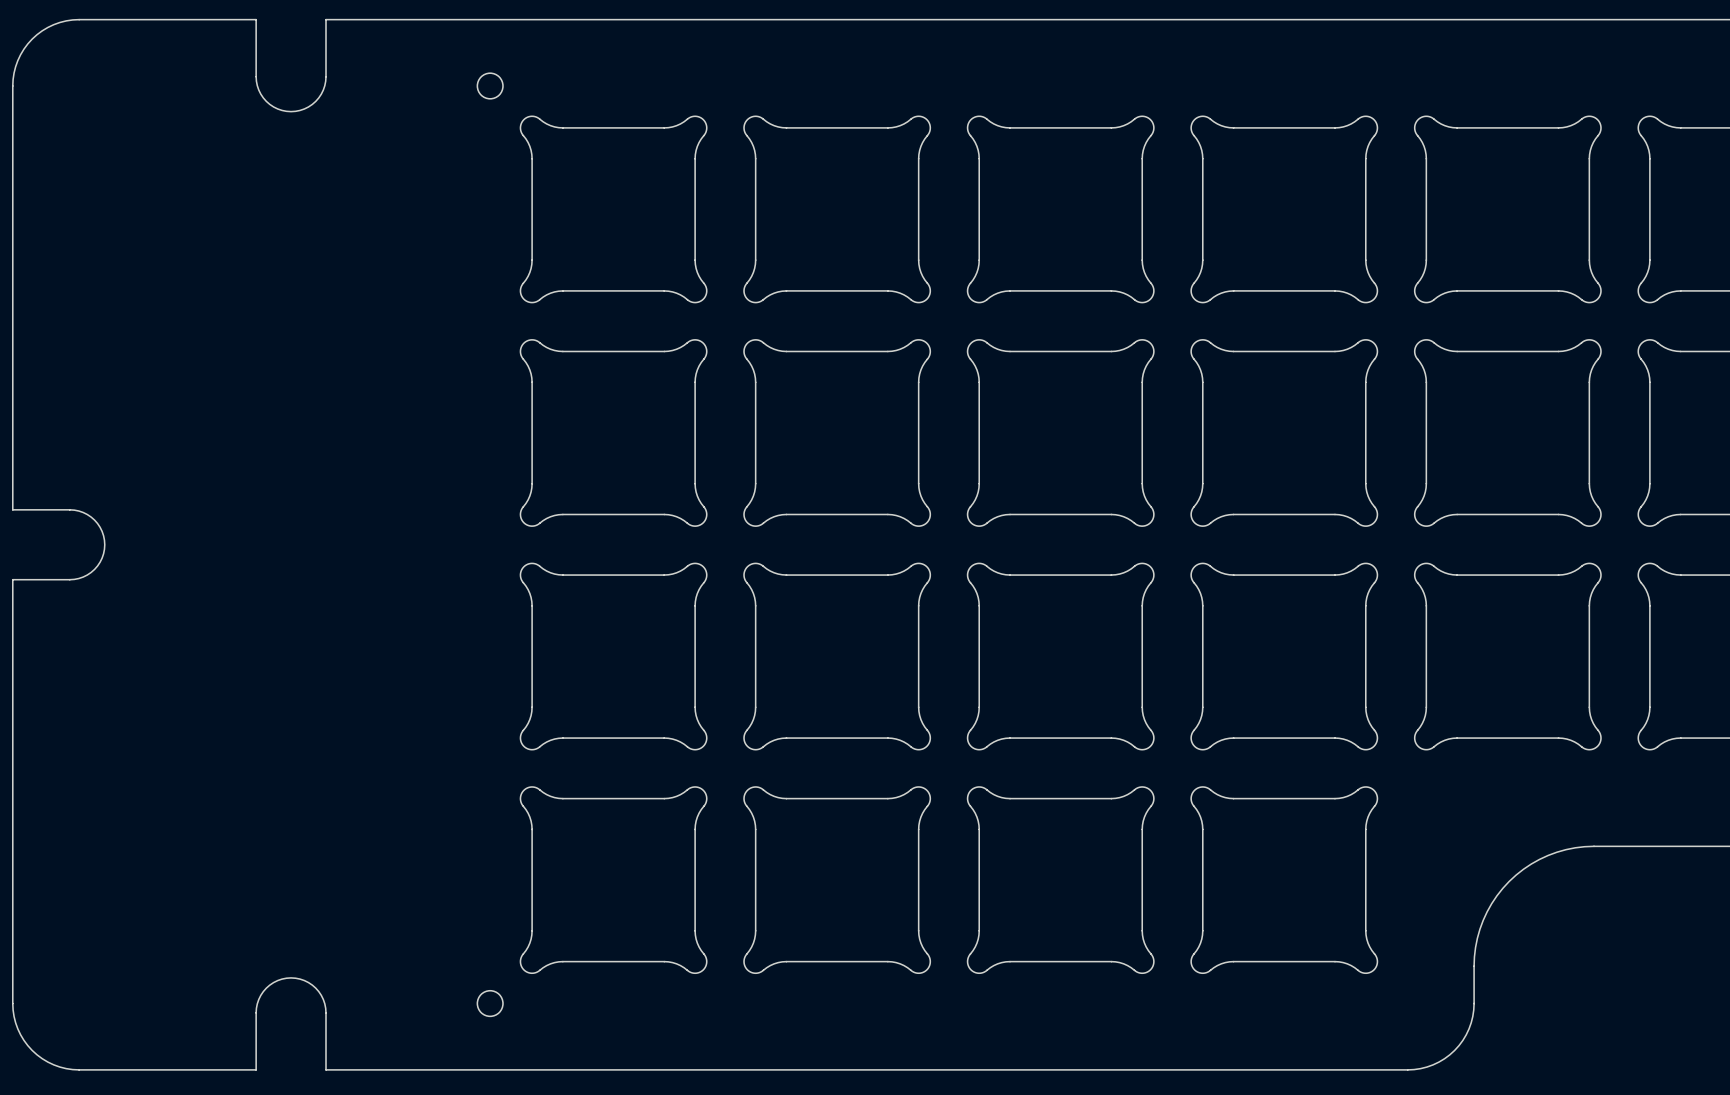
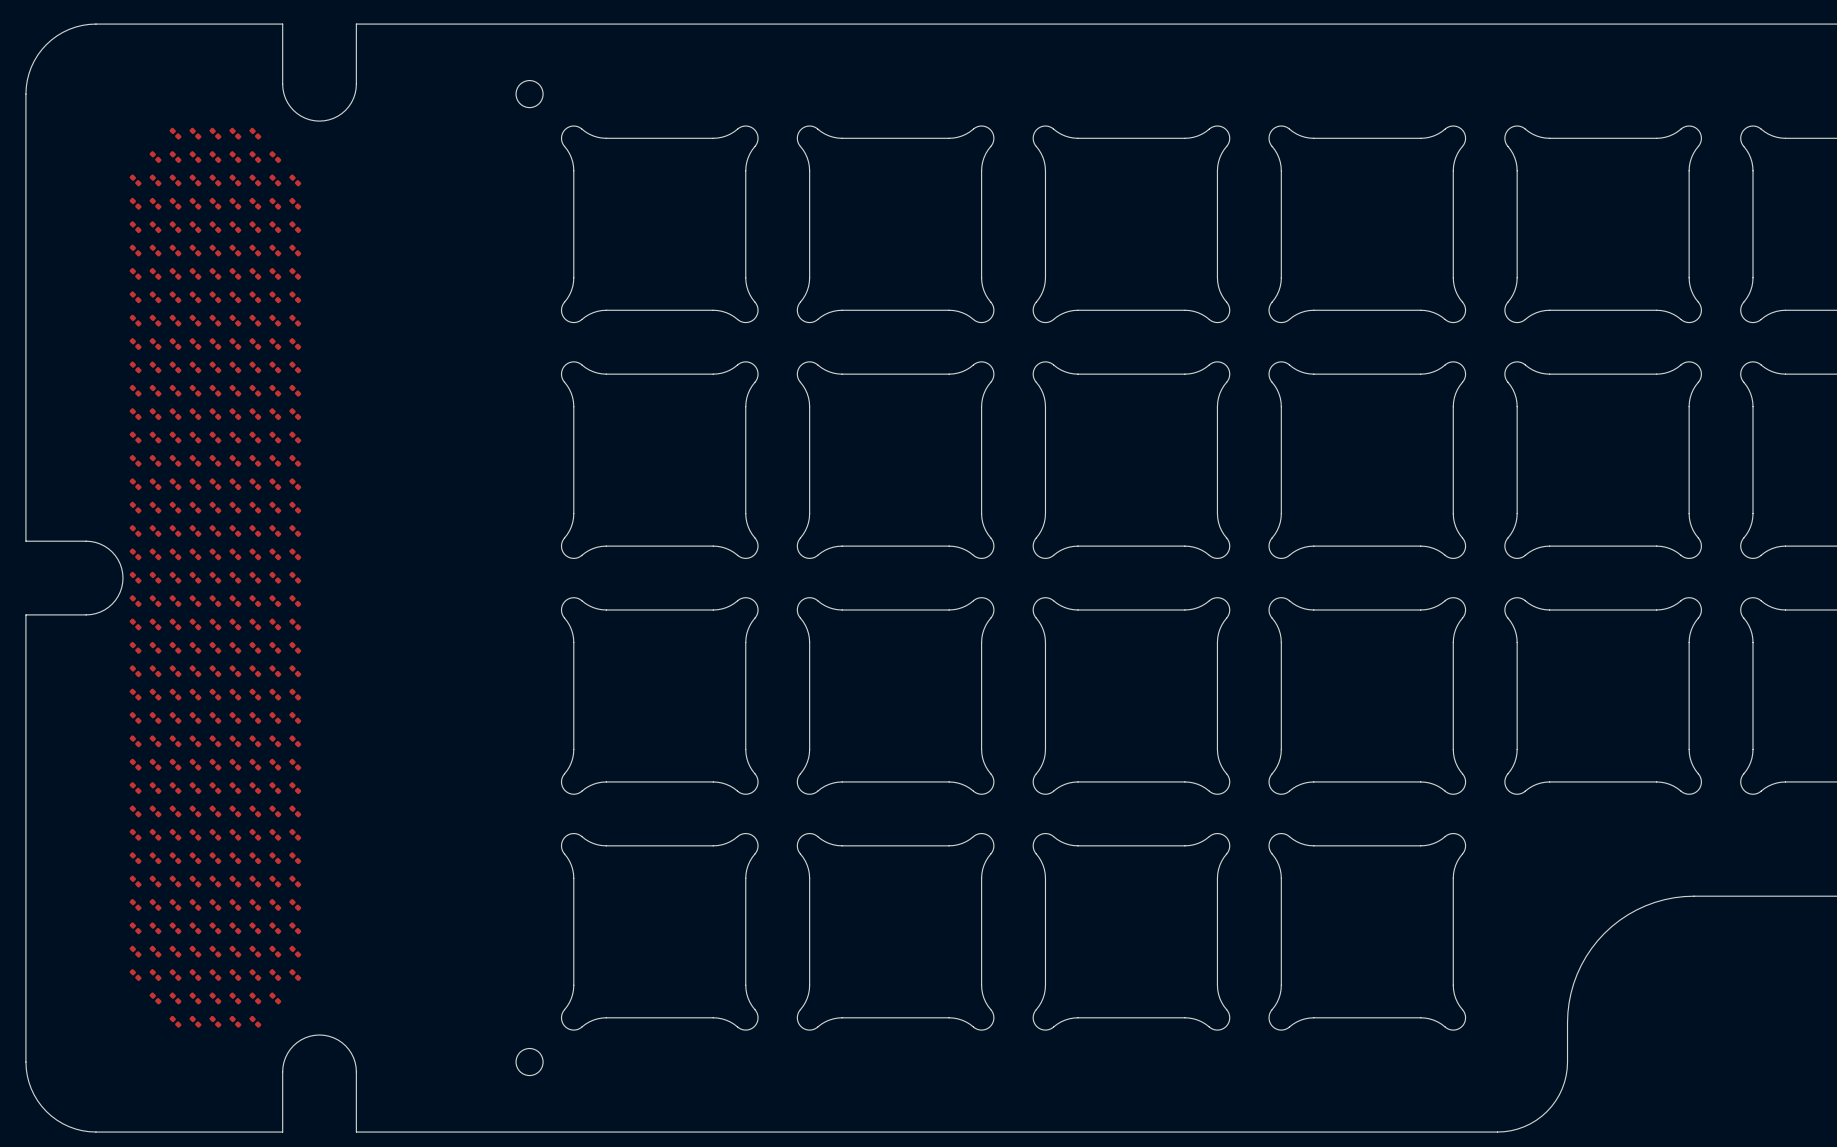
part: none -> (175, 133)
part: none -> (195, 133)
part: none -> (215, 133)
part: none -> (235, 133)
part: none -> (255, 133)
part: none -> (155, 157)
part: none -> (175, 157)
part: none -> (195, 157)
part: none -> (215, 157)
part: none -> (235, 157)
part: none -> (255, 157)
part: none -> (275, 157)
part: none -> (135, 180)
part: none -> (155, 180)
part: none -> (175, 180)
part: none -> (195, 180)
part: none -> (215, 180)
part: none -> (235, 180)
part: none -> (255, 180)
part: none -> (275, 180)
part: none -> (295, 180)
part: none -> (135, 203)
part: none -> (155, 203)
part: none -> (175, 203)
part: none -> (195, 203)
part: none -> (215, 203)
part: none -> (235, 203)
part: none -> (255, 203)
part: none -> (275, 203)
part: none -> (295, 203)
part: none -> (135, 227)
part: none -> (155, 227)
part: none -> (175, 227)
part: none -> (195, 227)
part: none -> (215, 227)
part: none -> (235, 227)
part: none -> (255, 227)
part: none -> (275, 227)
part: none -> (295, 227)
part: none -> (135, 250)
part: none -> (155, 250)
part: none -> (175, 250)
part: none -> (195, 250)
part: none -> (215, 250)
part: none -> (235, 250)
part: none -> (255, 250)
part: none -> (275, 250)
part: none -> (295, 250)
part: none -> (135, 273)
part: none -> (155, 273)
part: none -> (175, 273)
part: none -> (195, 273)
part: none -> (215, 273)
part: none -> (235, 273)
part: none -> (255, 273)
part: none -> (275, 273)
part: none -> (295, 273)
part: none -> (135, 297)
part: none -> (155, 297)
part: none -> (175, 297)
part: none -> (195, 297)
part: none -> (215, 297)
part: none -> (235, 297)
part: none -> (255, 297)
part: none -> (275, 297)
part: none -> (295, 297)
part: none -> (135, 320)
part: none -> (155, 320)
part: none -> (175, 320)
part: none -> (195, 320)
part: none -> (215, 320)
part: none -> (235, 320)
part: none -> (255, 320)
part: none -> (275, 320)
part: none -> (295, 320)
part: none -> (135, 344)
part: none -> (155, 344)
part: none -> (175, 344)
part: none -> (195, 344)
part: none -> (215, 344)
part: none -> (235, 344)
part: none -> (255, 344)
part: none -> (275, 344)
part: none -> (295, 344)
part: none -> (135, 367)
part: none -> (155, 367)
part: none -> (175, 367)
part: none -> (195, 367)
part: none -> (215, 367)
part: none -> (235, 367)
part: none -> (255, 367)
part: none -> (275, 367)
part: none -> (295, 367)
part: none -> (135, 390)
part: none -> (155, 390)
part: none -> (175, 390)
part: none -> (195, 390)
part: none -> (215, 390)
part: none -> (235, 390)
part: none -> (255, 390)
part: none -> (275, 390)
part: none -> (295, 390)
part: none -> (135, 414)
part: none -> (155, 414)
part: none -> (175, 414)
part: none -> (195, 414)
part: none -> (215, 414)
part: none -> (235, 414)
part: none -> (255, 414)
part: none -> (275, 414)
part: none -> (295, 414)
part: none -> (135, 437)
part: none -> (155, 437)
part: none -> (175, 437)
part: none -> (195, 437)
part: none -> (215, 437)
part: none -> (235, 437)
part: none -> (255, 437)
part: none -> (275, 437)
part: none -> (295, 437)
part: none -> (135, 460)
part: none -> (155, 460)
part: none -> (175, 460)
part: none -> (195, 460)
part: none -> (215, 460)
part: none -> (235, 460)
part: none -> (255, 460)
part: none -> (275, 460)
part: none -> (295, 460)
part: none -> (135, 484)
part: none -> (155, 484)
part: none -> (175, 484)
part: none -> (195, 484)
part: none -> (215, 484)
part: none -> (235, 484)
part: none -> (255, 484)
part: none -> (275, 484)
part: none -> (295, 484)
part: none -> (135, 507)
part: none -> (155, 507)
part: none -> (175, 507)
part: none -> (195, 507)
part: none -> (215, 507)
part: none -> (235, 507)
part: none -> (255, 507)
part: none -> (275, 507)
part: none -> (295, 507)
part: none -> (135, 531)
part: none -> (155, 531)
part: none -> (175, 531)
part: none -> (195, 531)
part: none -> (215, 531)
part: none -> (235, 531)
part: none -> (255, 531)
part: none -> (275, 531)
part: none -> (295, 531)
part: none -> (135, 554)
part: none -> (155, 554)
part: none -> (175, 554)
part: none -> (195, 554)
part: none -> (215, 554)
part: none -> (235, 554)
part: none -> (255, 554)
part: none -> (275, 554)
part: none -> (295, 554)
part: none -> (135, 577)
part: none -> (155, 577)
part: none -> (175, 577)
part: none -> (195, 577)
part: none -> (215, 577)
part: none -> (235, 577)
part: none -> (255, 577)
part: none -> (275, 577)
part: none -> (295, 577)
part: none -> (135, 601)
part: none -> (155, 601)
part: none -> (175, 601)
part: none -> (195, 601)
part: none -> (215, 601)
part: none -> (235, 601)
part: none -> (255, 601)
part: none -> (275, 601)
part: none -> (295, 601)
part: none -> (135, 624)
part: none -> (155, 624)
part: none -> (175, 624)
part: none -> (195, 624)
part: none -> (215, 624)
part: none -> (235, 624)
part: none -> (255, 624)
part: none -> (275, 624)
part: none -> (295, 624)
part: none -> (135, 647)
part: none -> (155, 647)
part: none -> (175, 647)
part: none -> (195, 647)
part: none -> (215, 647)
part: none -> (235, 647)
part: none -> (255, 647)
part: none -> (275, 647)
part: none -> (295, 647)
part: none -> (135, 671)
part: none -> (155, 671)
part: none -> (175, 671)
part: none -> (195, 671)
part: none -> (215, 671)
part: none -> (235, 671)
part: none -> (255, 671)
part: none -> (275, 671)
part: none -> (295, 671)
part: none -> (135, 694)
part: none -> (155, 694)
part: none -> (175, 694)
part: none -> (195, 694)
part: none -> (215, 694)
part: none -> (235, 694)
part: none -> (255, 694)
part: none -> (275, 694)
part: none -> (295, 694)
part: none -> (135, 717)
part: none -> (155, 717)
part: none -> (175, 717)
part: none -> (195, 717)
part: none -> (215, 717)
part: none -> (235, 717)
part: none -> (255, 717)
part: none -> (275, 717)
part: none -> (295, 717)
part: none -> (135, 741)
part: none -> (155, 741)
part: none -> (175, 741)
part: none -> (195, 741)
part: none -> (215, 741)
part: none -> (235, 741)
part: none -> (255, 741)
part: none -> (275, 741)
part: none -> (295, 741)
part: none -> (135, 764)
part: none -> (155, 764)
part: none -> (175, 764)
part: none -> (195, 764)
part: none -> (215, 764)
part: none -> (235, 764)
part: none -> (255, 764)
part: none -> (275, 764)
part: none -> (295, 764)
part: none -> (135, 788)
part: none -> (155, 788)
part: none -> (175, 788)
part: none -> (195, 788)
part: none -> (215, 788)
part: none -> (235, 788)
part: none -> (255, 788)
part: none -> (275, 788)
part: none -> (295, 788)
part: none -> (135, 811)
part: none -> (155, 811)
part: none -> (175, 811)
part: none -> (195, 811)
part: none -> (215, 811)
part: none -> (235, 811)
part: none -> (255, 811)
part: none -> (275, 811)
part: none -> (295, 811)
part: none -> (135, 834)
part: none -> (155, 834)
part: none -> (175, 834)
part: none -> (195, 834)
part: none -> (215, 834)
part: none -> (235, 834)
part: none -> (255, 834)
part: none -> (275, 834)
part: none -> (295, 834)
part: none -> (135, 858)
part: none -> (155, 858)
part: none -> (175, 858)
part: none -> (195, 858)
part: none -> (215, 858)
part: none -> (235, 858)
part: none -> (255, 858)
part: none -> (275, 858)
part: none -> (295, 858)
part: none -> (135, 881)
part: none -> (155, 881)
part: none -> (175, 881)
part: none -> (195, 881)
part: none -> (215, 881)
part: none -> (235, 881)
part: none -> (255, 881)
part: none -> (275, 881)
part: none -> (295, 881)
part: none -> (135, 904)
part: none -> (155, 904)
part: none -> (175, 904)
part: none -> (195, 904)
part: none -> (215, 904)
part: none -> (235, 904)
part: none -> (255, 904)
part: none -> (275, 904)
part: none -> (295, 904)
part: none -> (135, 928)
part: none -> (155, 928)
part: none -> (175, 928)
part: none -> (195, 928)
part: none -> (215, 928)
part: none -> (235, 928)
part: none -> (255, 928)
part: none -> (275, 928)
part: none -> (295, 928)
part: none -> (135, 951)
part: none -> (155, 951)
part: none -> (175, 951)
part: none -> (195, 951)
part: none -> (215, 951)
part: none -> (235, 951)
part: none -> (255, 951)
part: none -> (275, 951)
part: none -> (295, 951)
part: none -> (135, 975)
part: none -> (155, 975)
part: none -> (175, 975)
part: none -> (195, 975)
part: none -> (215, 975)
part: none -> (235, 975)
part: none -> (255, 975)
part: none -> (275, 975)
part: none -> (295, 975)
part: none -> (155, 998)
part: none -> (175, 998)
part: none -> (195, 998)
part: none -> (215, 998)
part: none -> (235, 998)
part: none -> (255, 998)
part: none -> (275, 998)
part: none -> (175, 1021)
part: none -> (195, 1021)
part: none -> (215, 1021)
part: none -> (235, 1021)
part: none -> (255, 1021)

